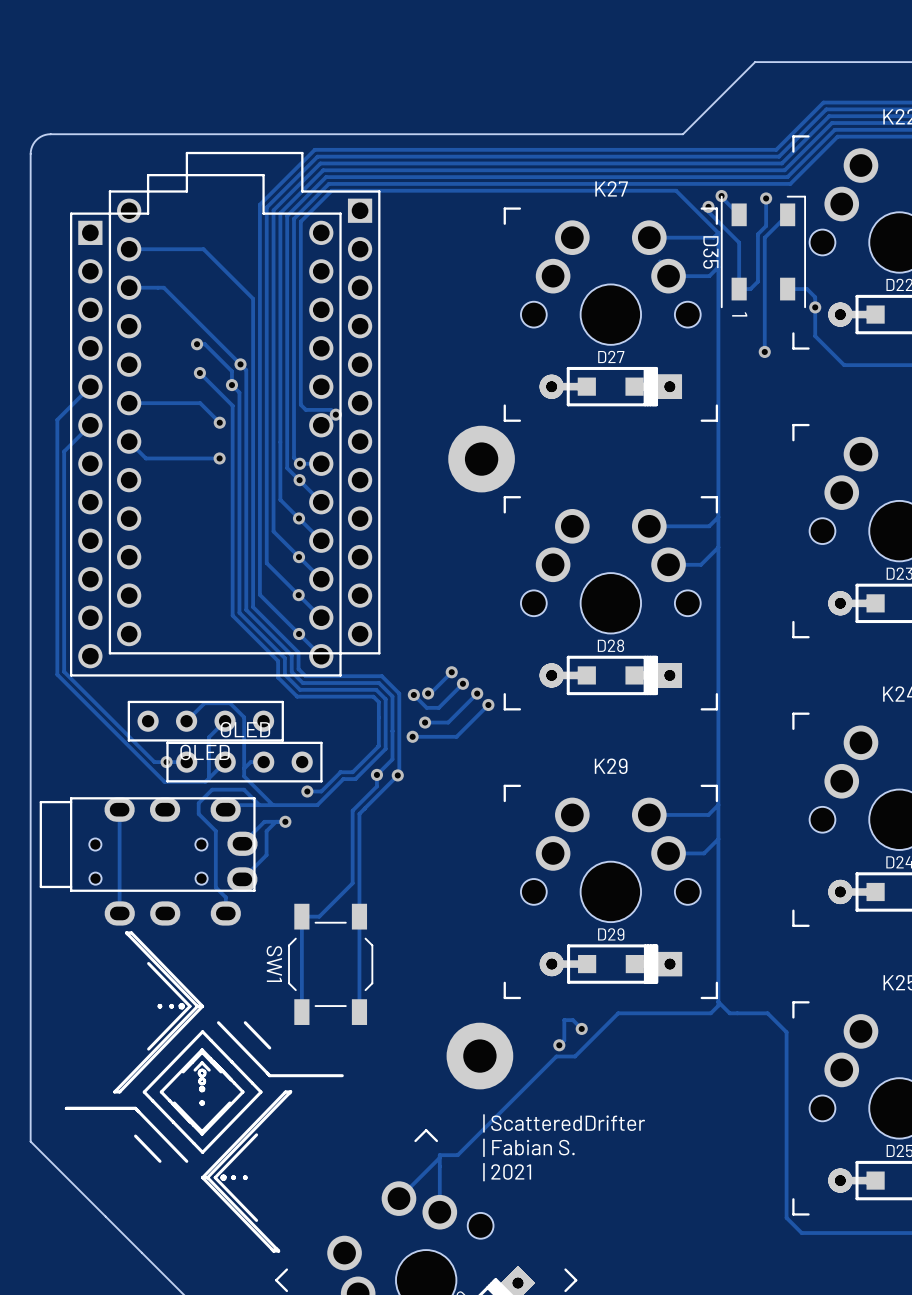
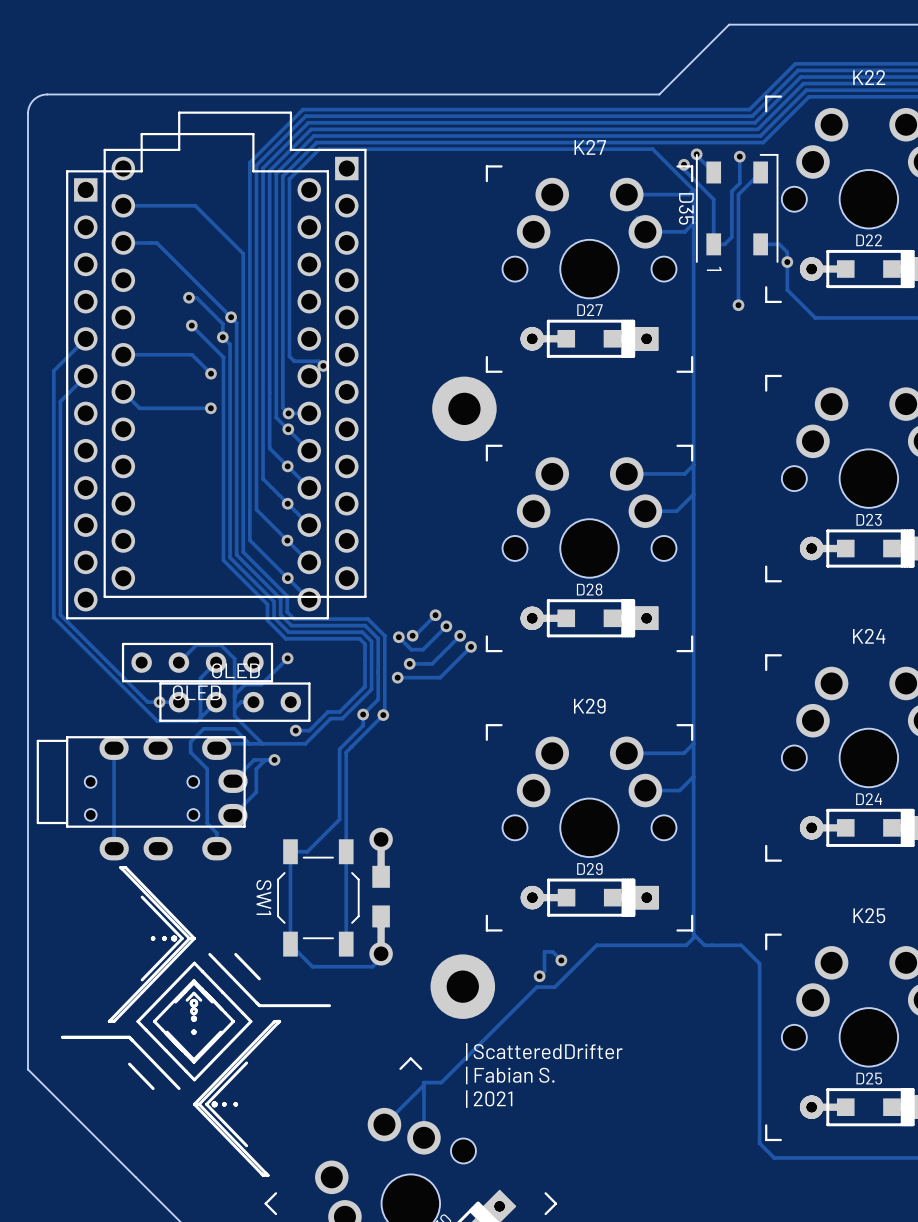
track: none -> (287, 658) (261, 684) (245, 684) (234, 694)
via: none -> (287, 658)
part: none -> (381, 896)
track: none -> (290, 944) (312, 966) (372, 966) (381, 958) (381, 953)

